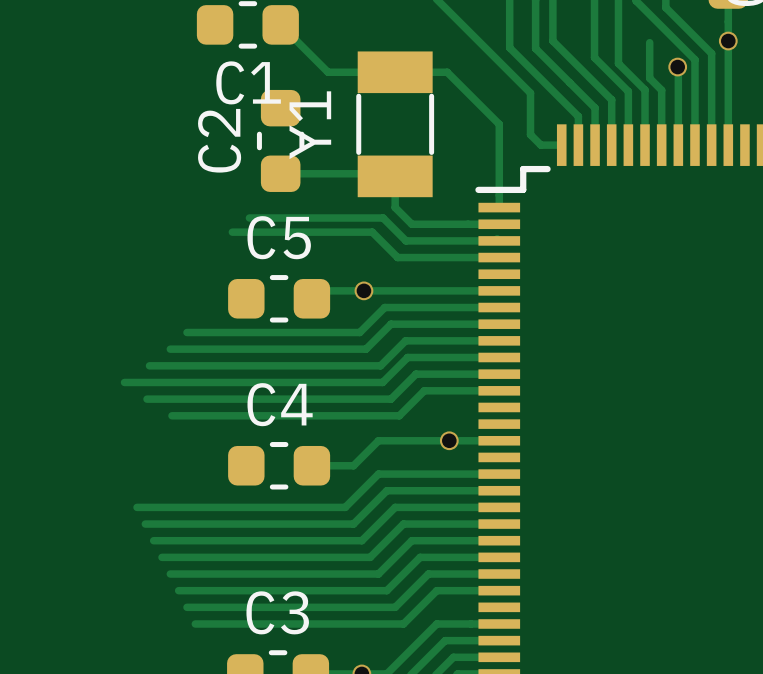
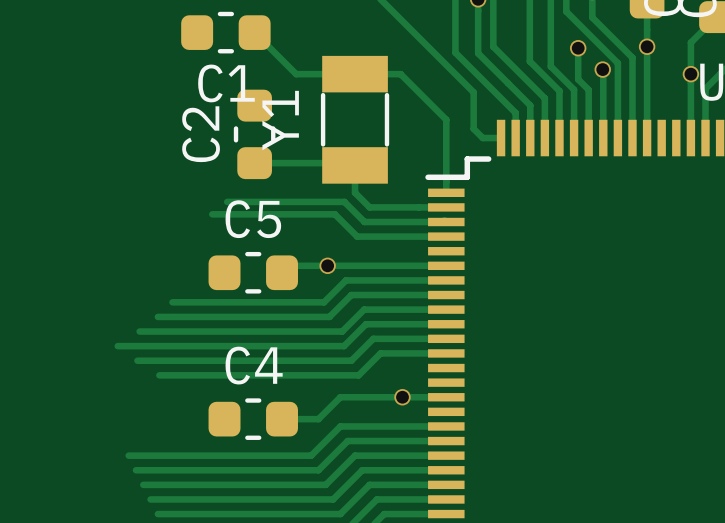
via: none -> (578, 48)

